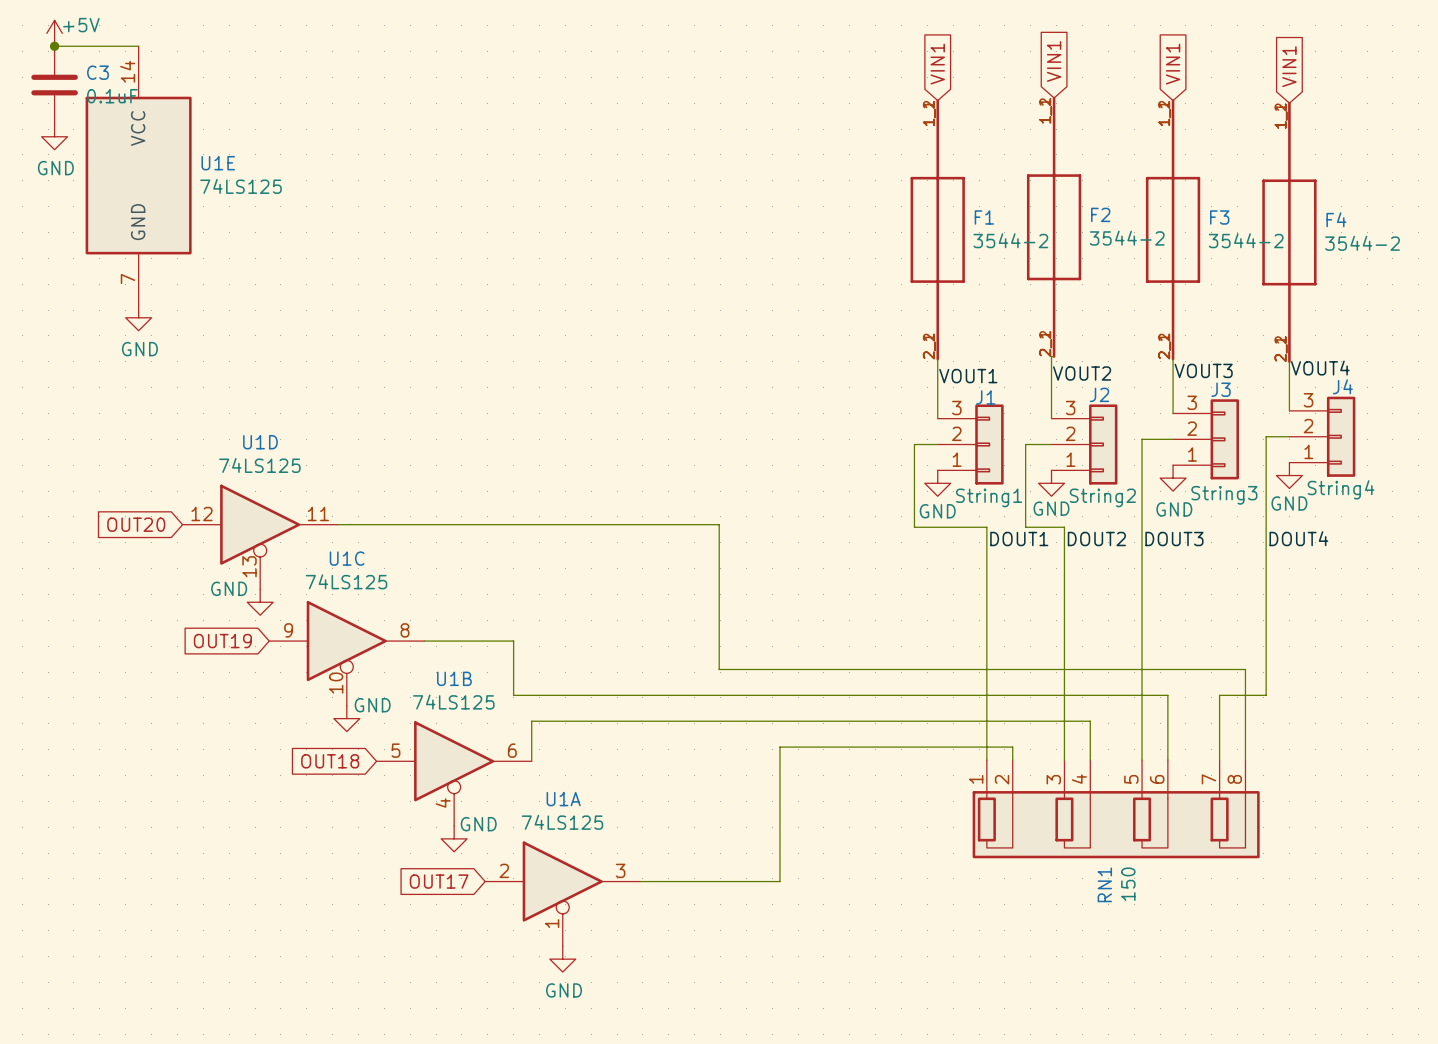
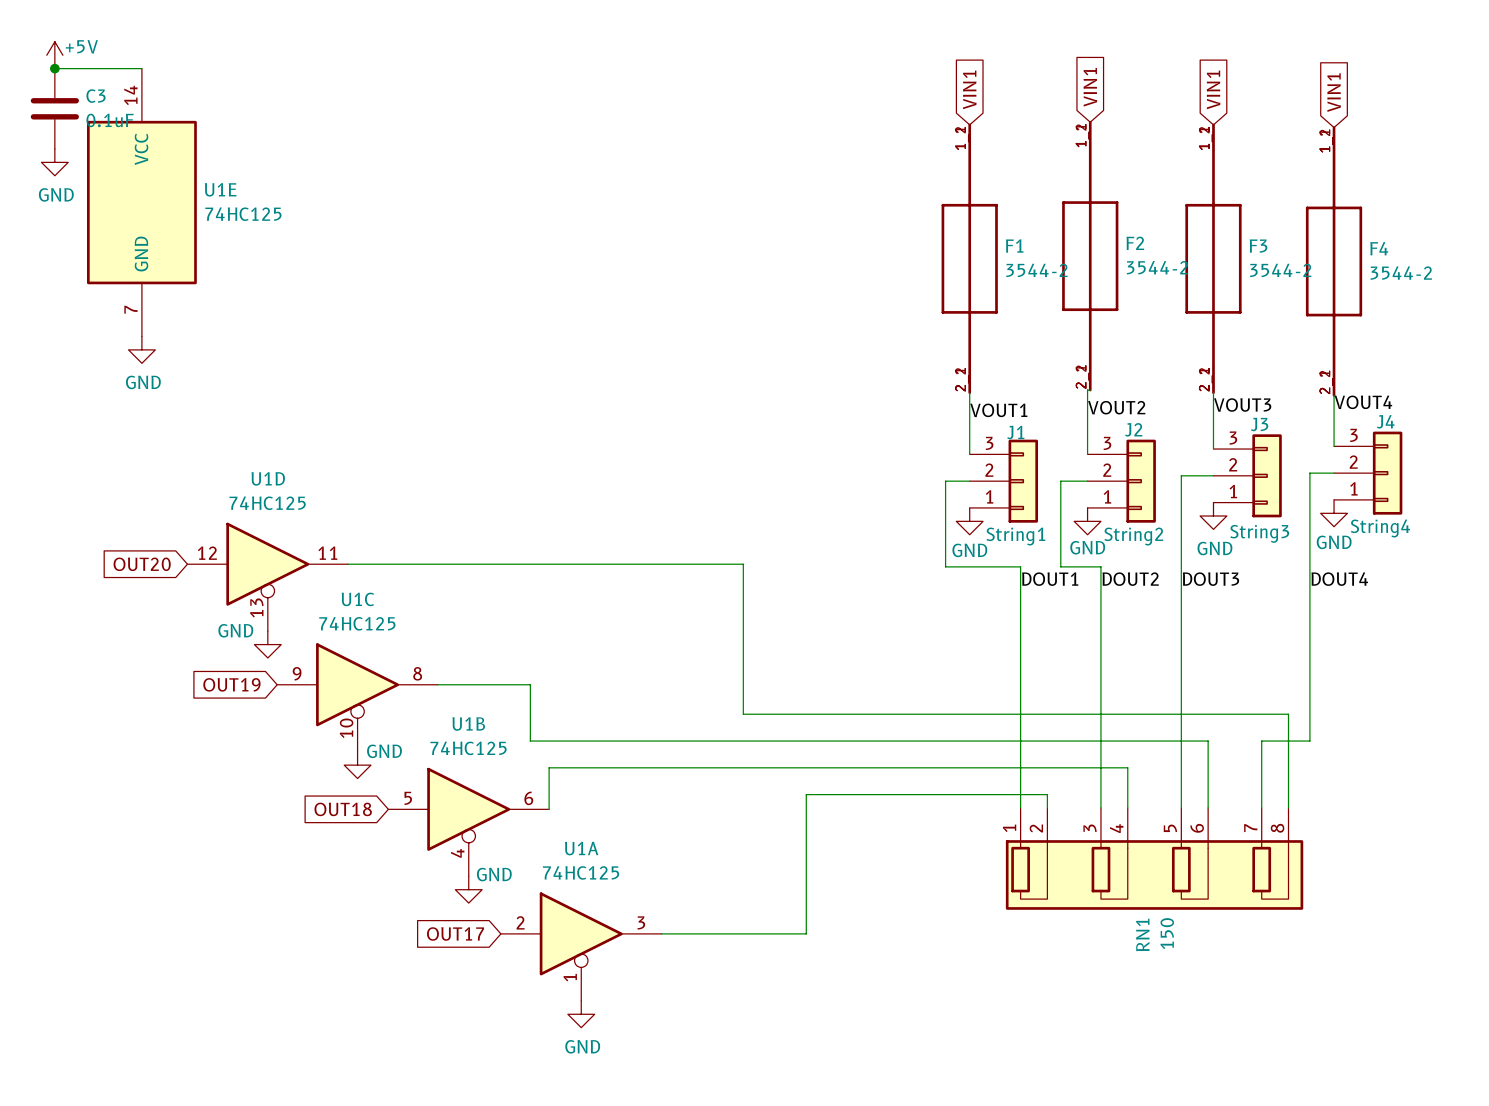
U1E value: 74LS125 (241, 186) -> 74HC125 (243, 214)
U1D value: 74LS125 (259, 465) -> 74HC125 (267, 503)
U1C value: 74LS125 (346, 581) -> 74HC125 (357, 623)
U1B value: 74LS125 (453, 702) -> 74HC125 (468, 748)
U1A value: 74LS125 (562, 822) -> 74HC125 (581, 872)

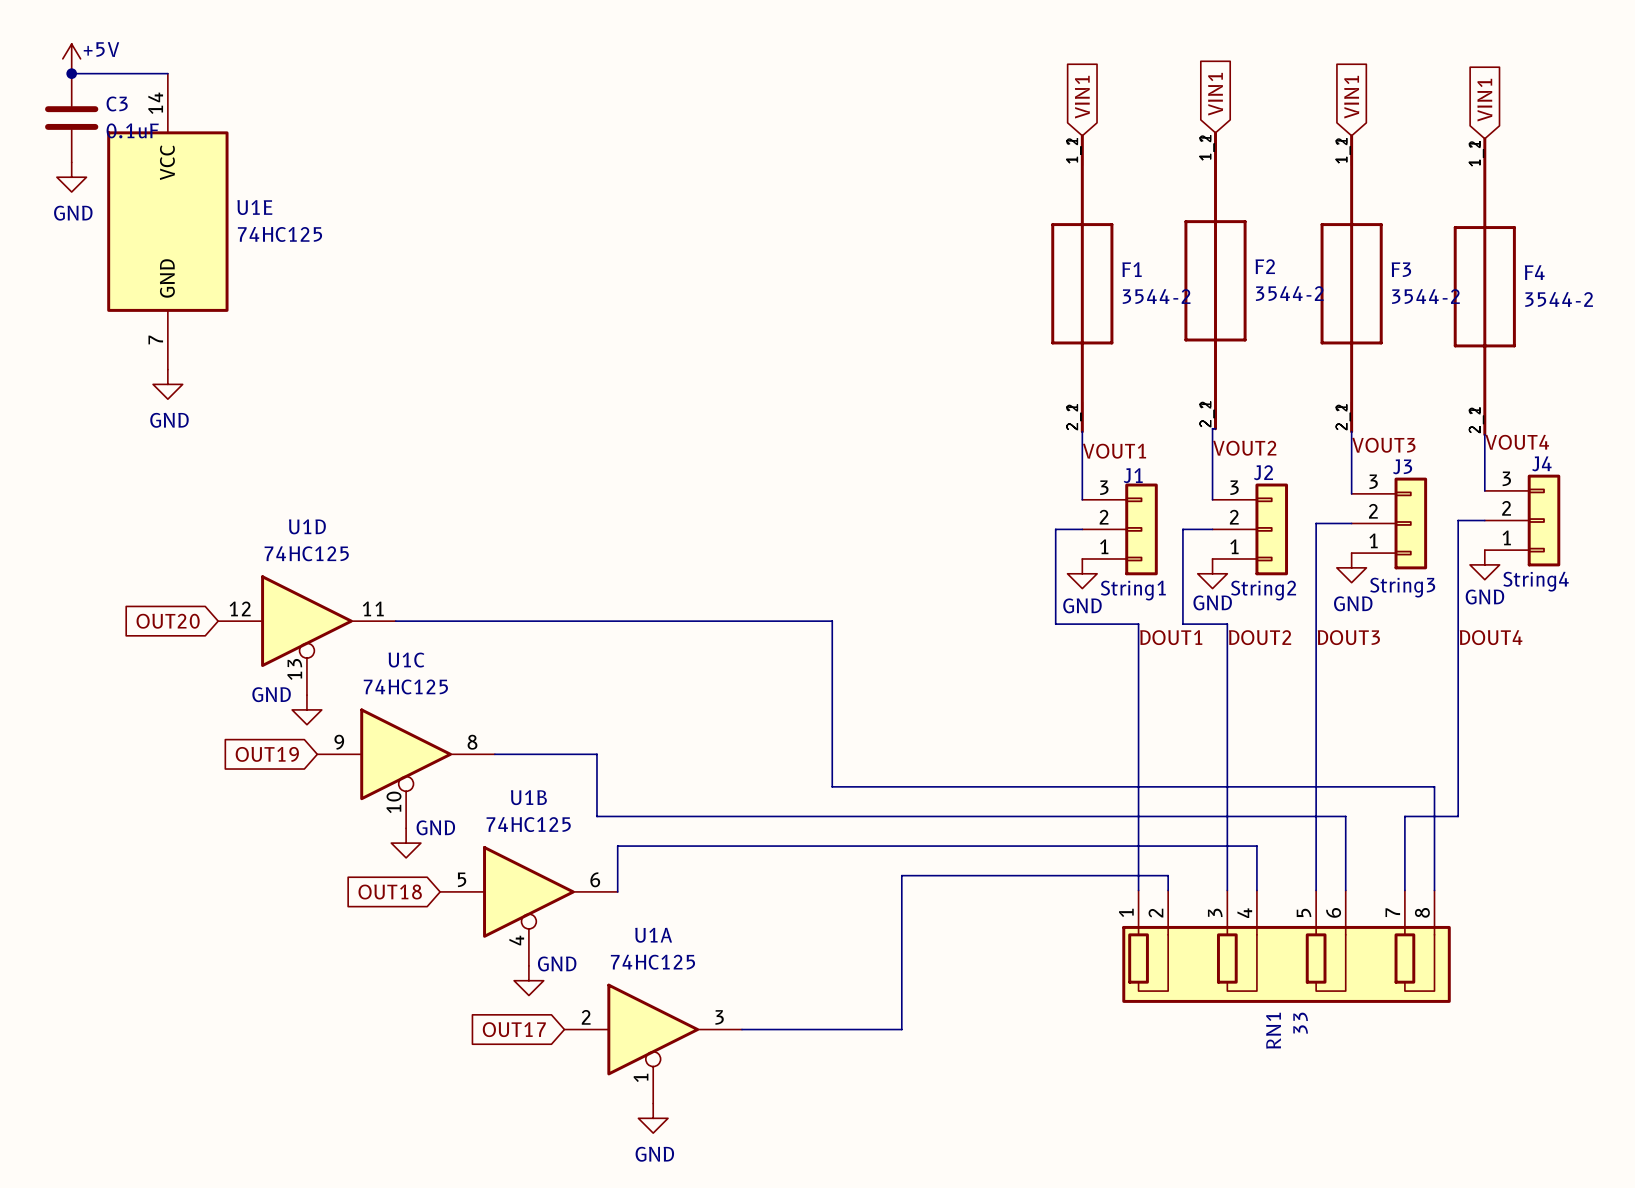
RN1 value: 150 (1167, 933) -> 33 (1300, 1023)

